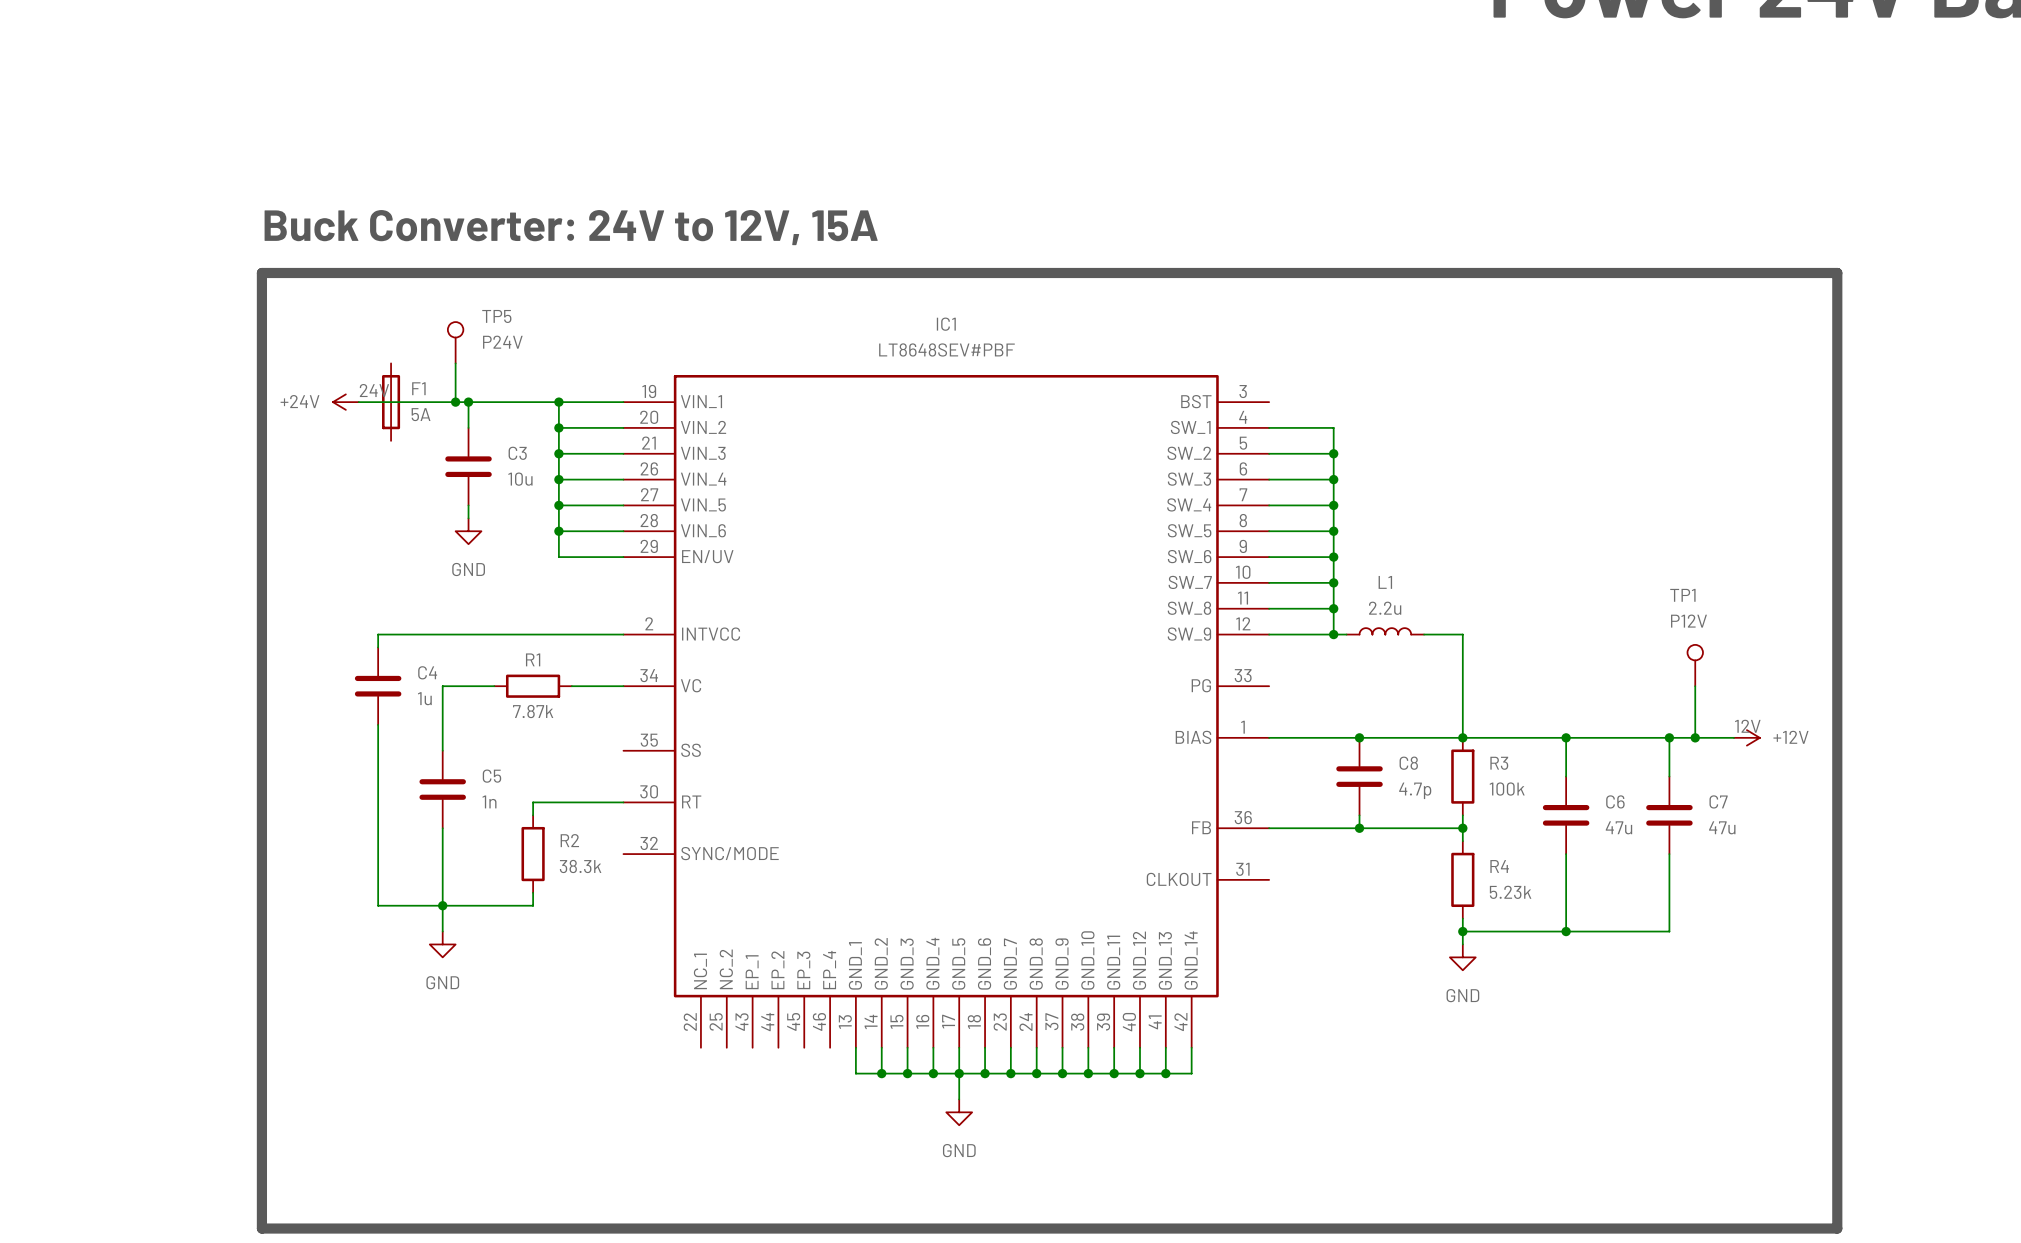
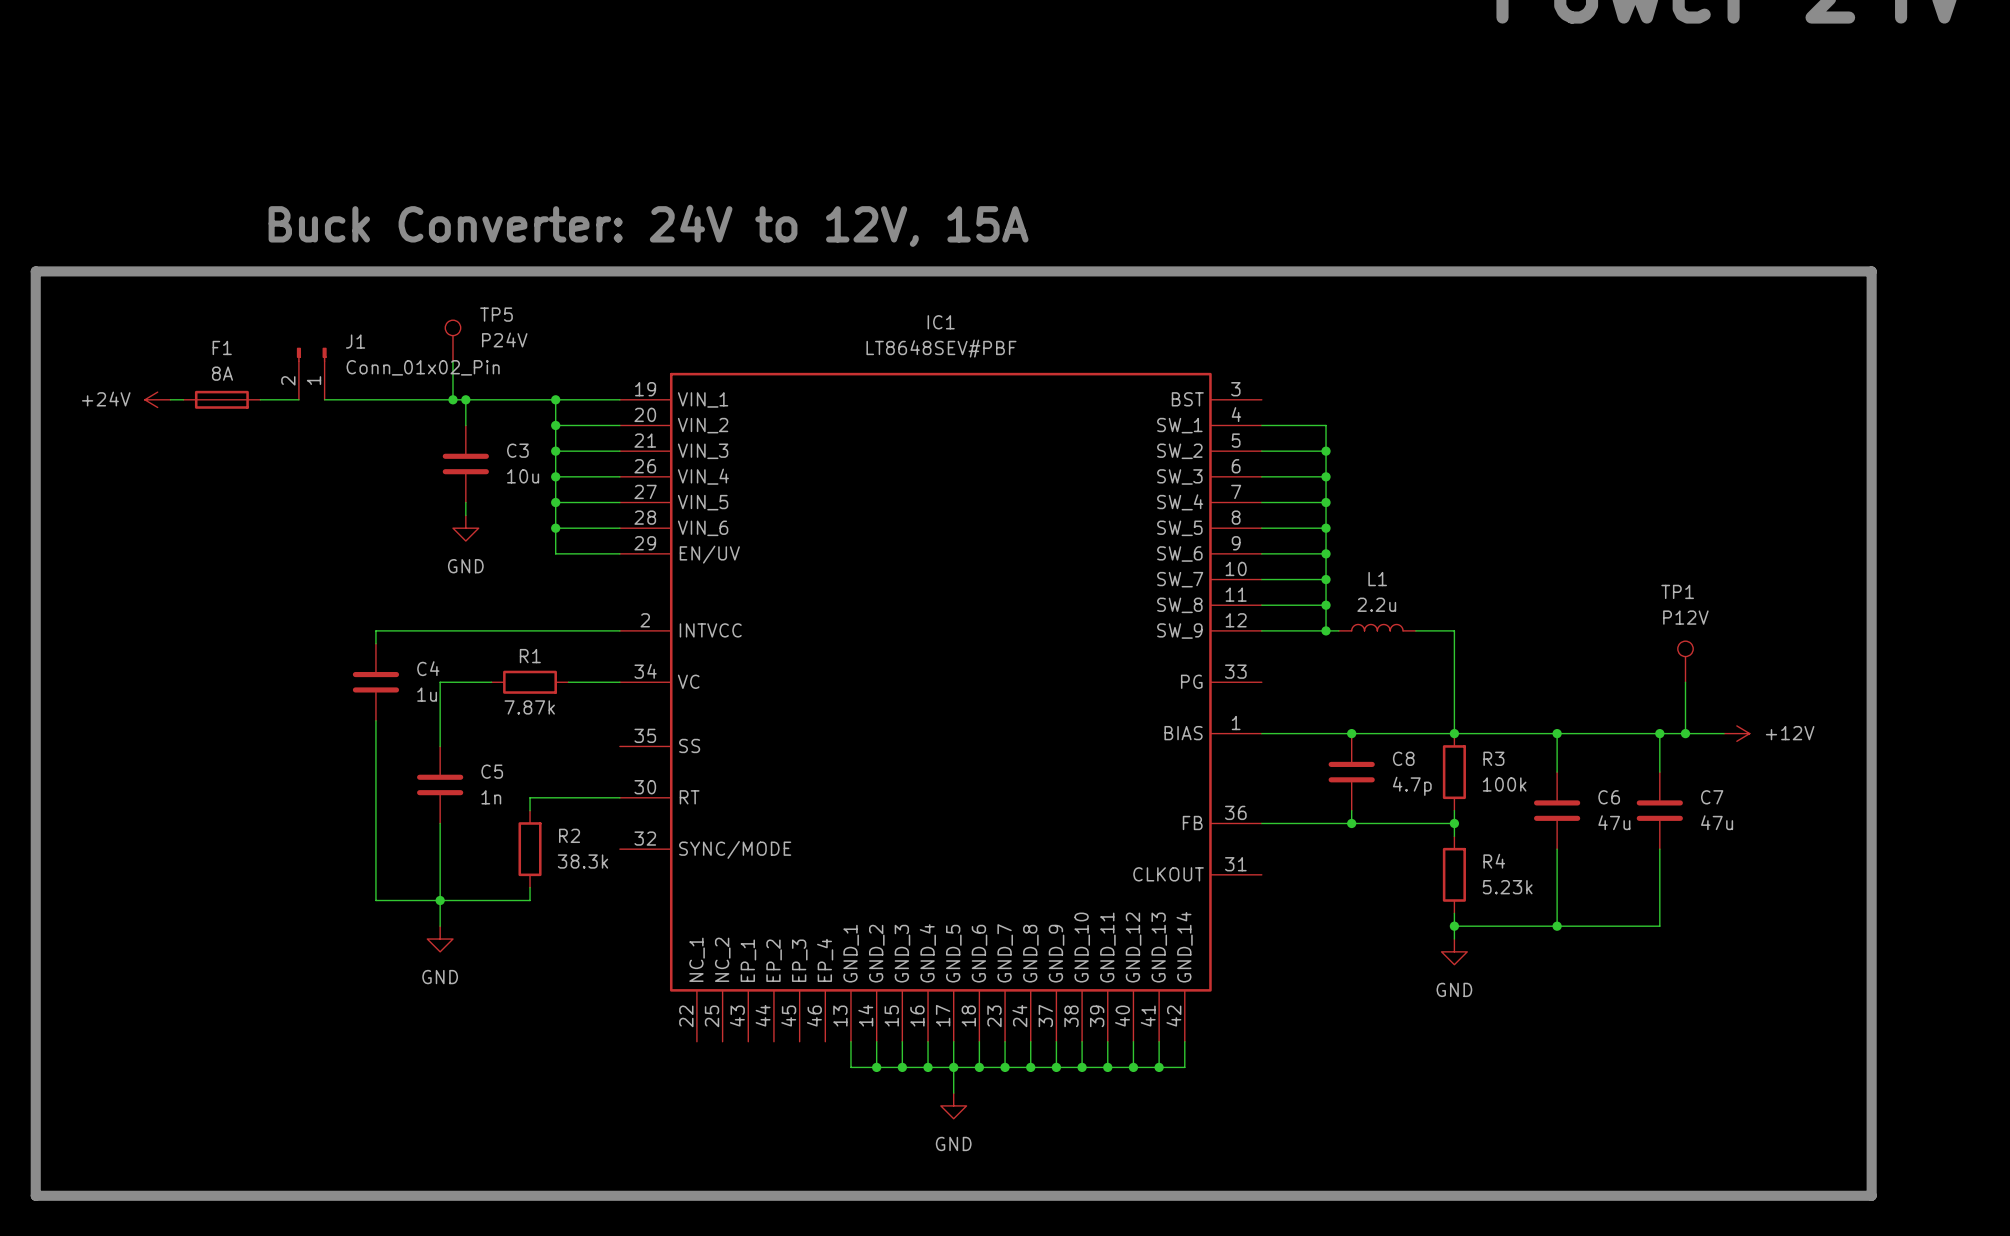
line: (261, 272) (261, 1228) (1837, 1228) (1837, 272) -> (260, 271) (35, 271) (35, 1195) (1871, 1195) (1871, 271) (1826, 271)
J1: none -> Conn_01x02_Pin (311, 373)
F1 name position: F1 (418, 388) -> F1 (222, 347)
label: 24V (374, 390) -> none
wire: none -> (170, 399) (183, 399)
wire: none -> (260, 399) (298, 399)
power symbol position: +24V (345, 402) -> +24V (157, 399)
F1 rotation: 0° (391, 402) -> 90° clockwise (221, 399)
F1 position: (391, 402) -> (221, 399)
F1 value: 5A (421, 414) -> 8A (222, 373)
label: 12V (1747, 726) -> none

